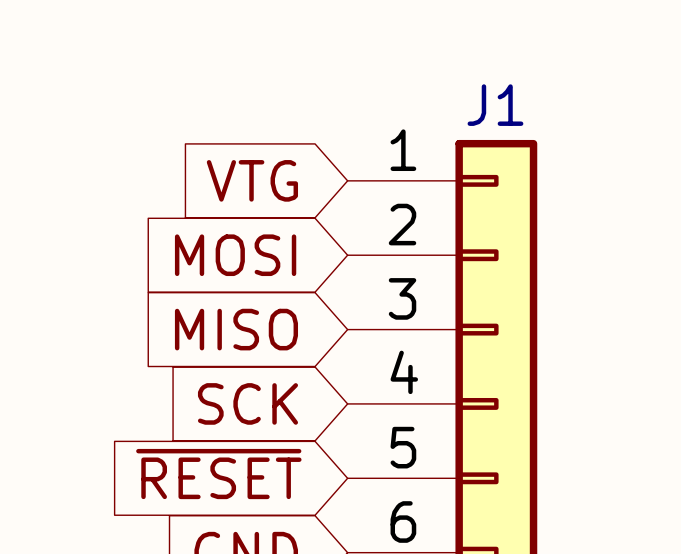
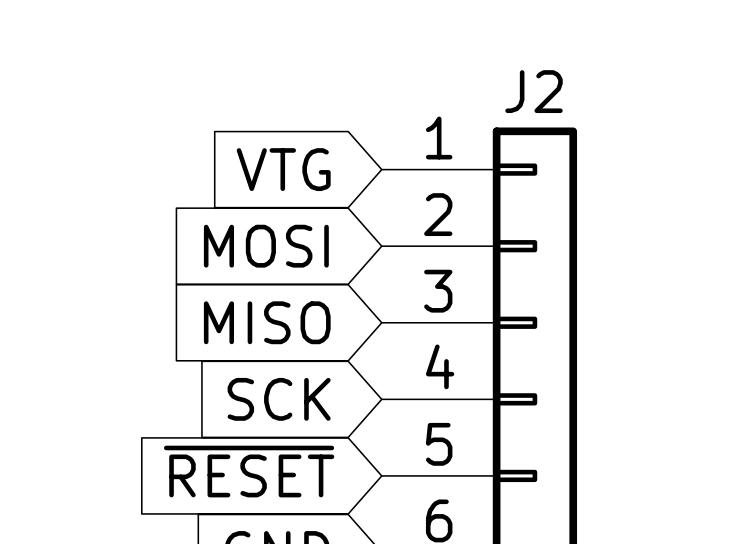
J1 name: J1 (495, 105) -> J2 (534, 91)

